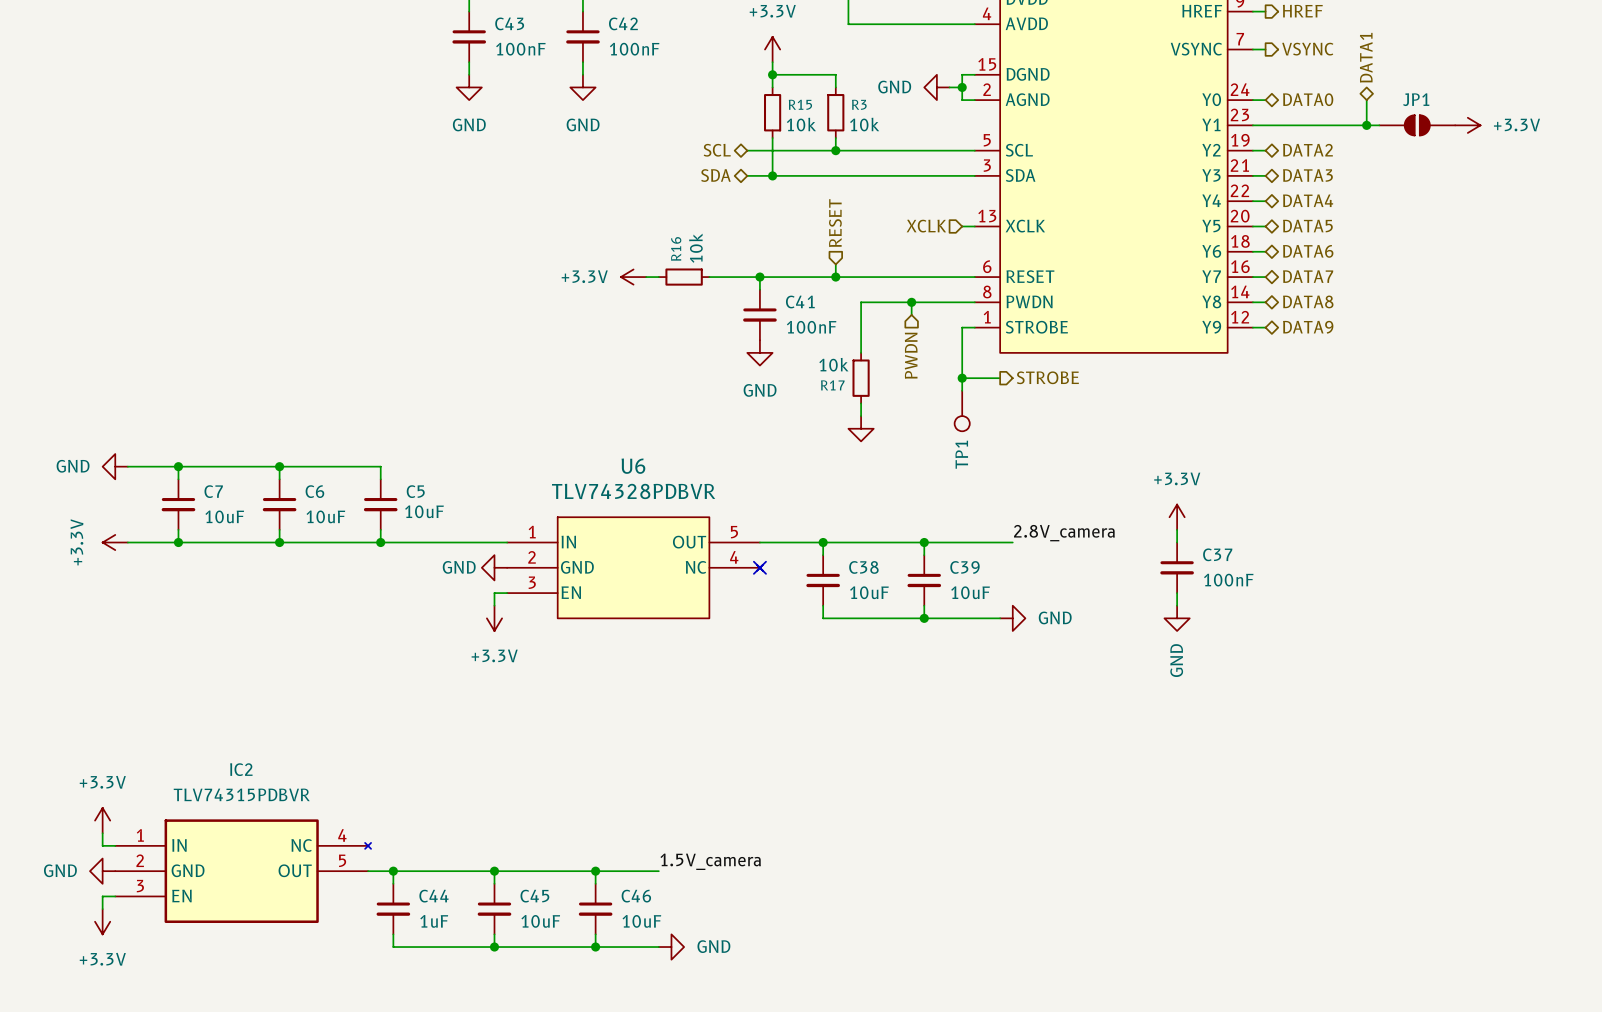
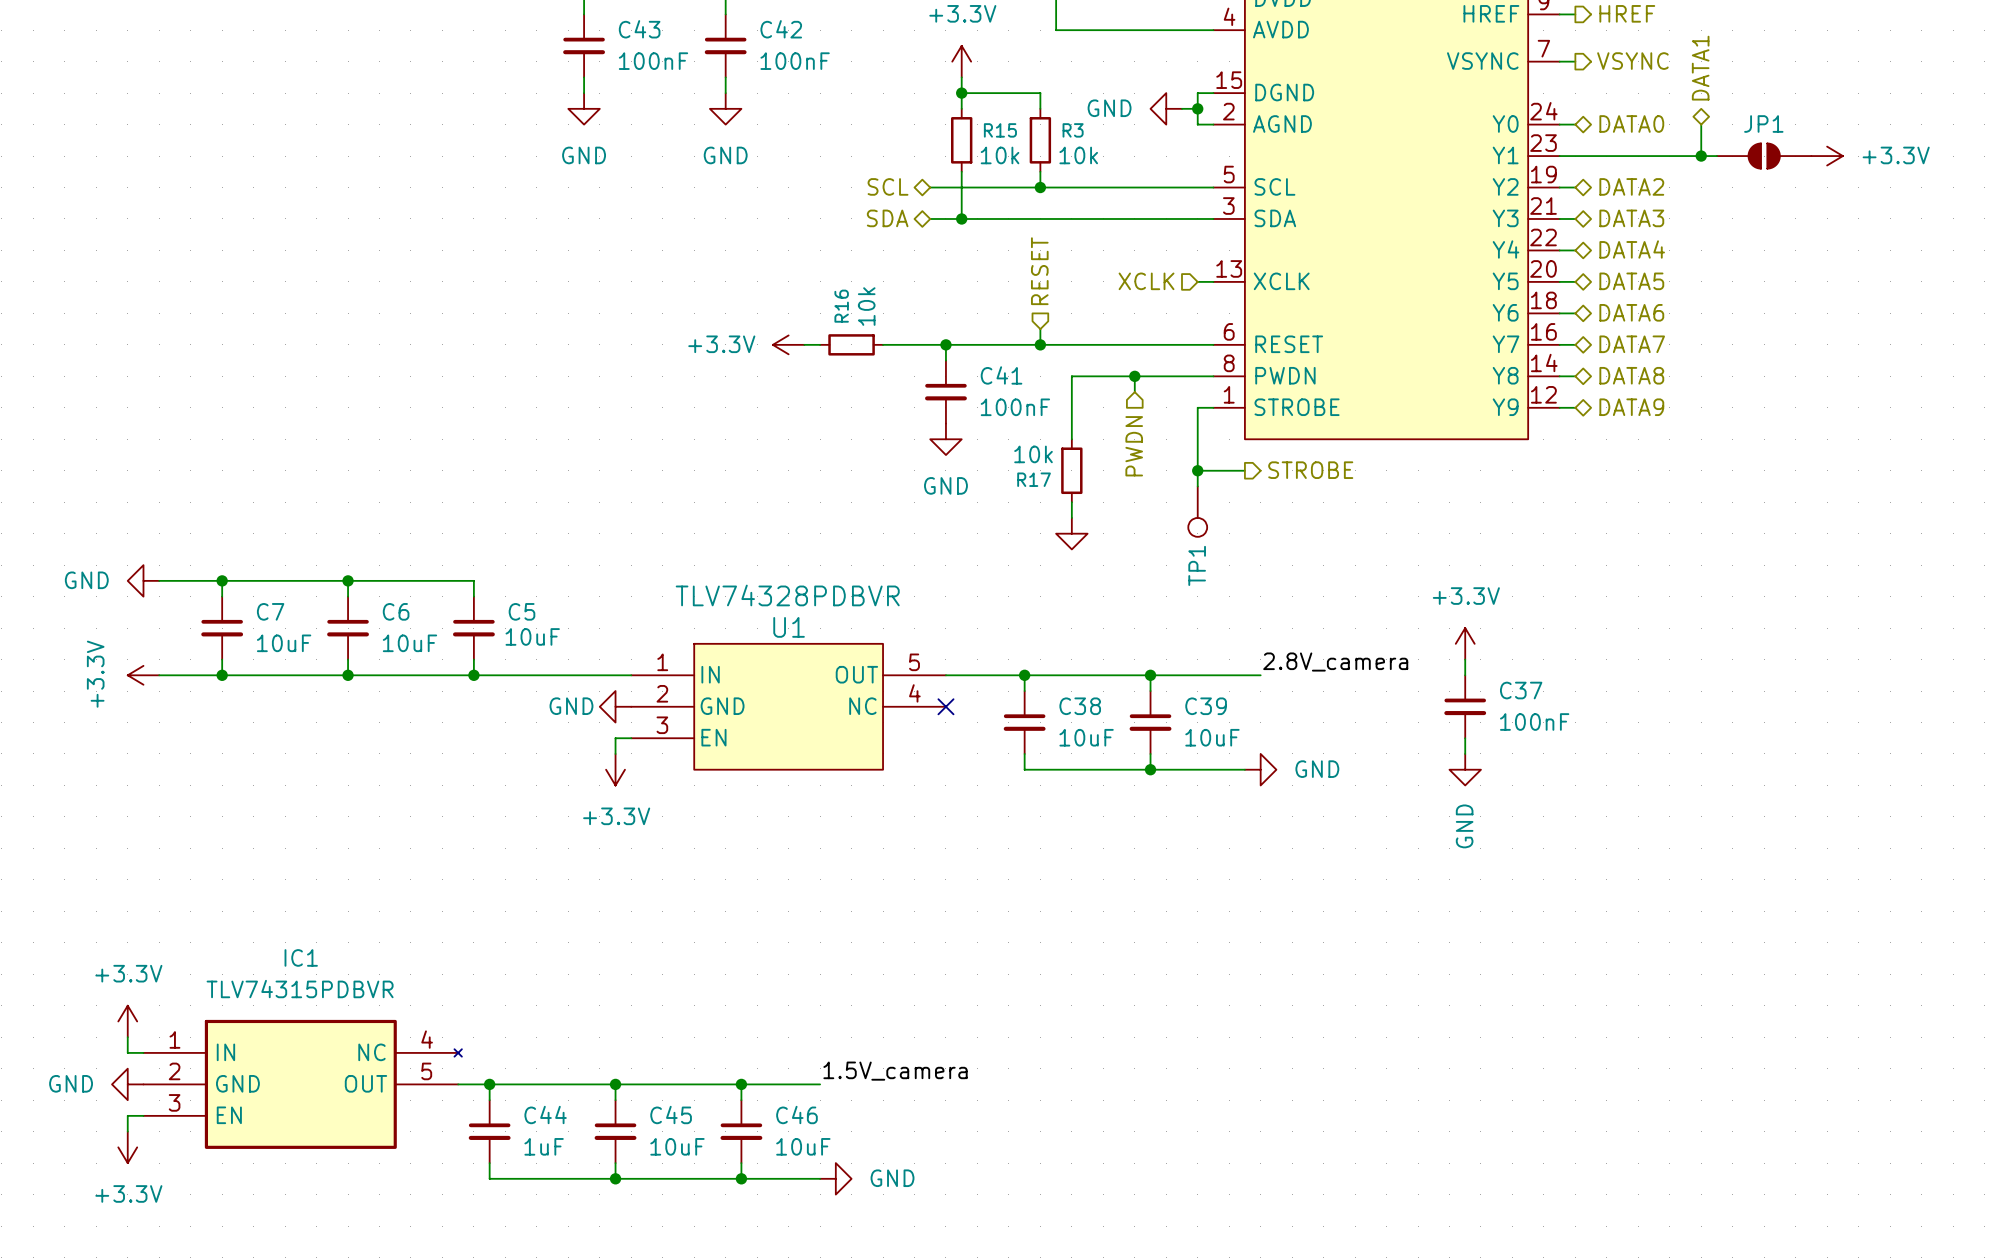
U1: none -> TLV74328PDBVR (788, 706)
U6: TLV74328PDBVR (635, 567) -> none
IC2 name: IC2 (241, 769) -> IC1 (301, 957)

